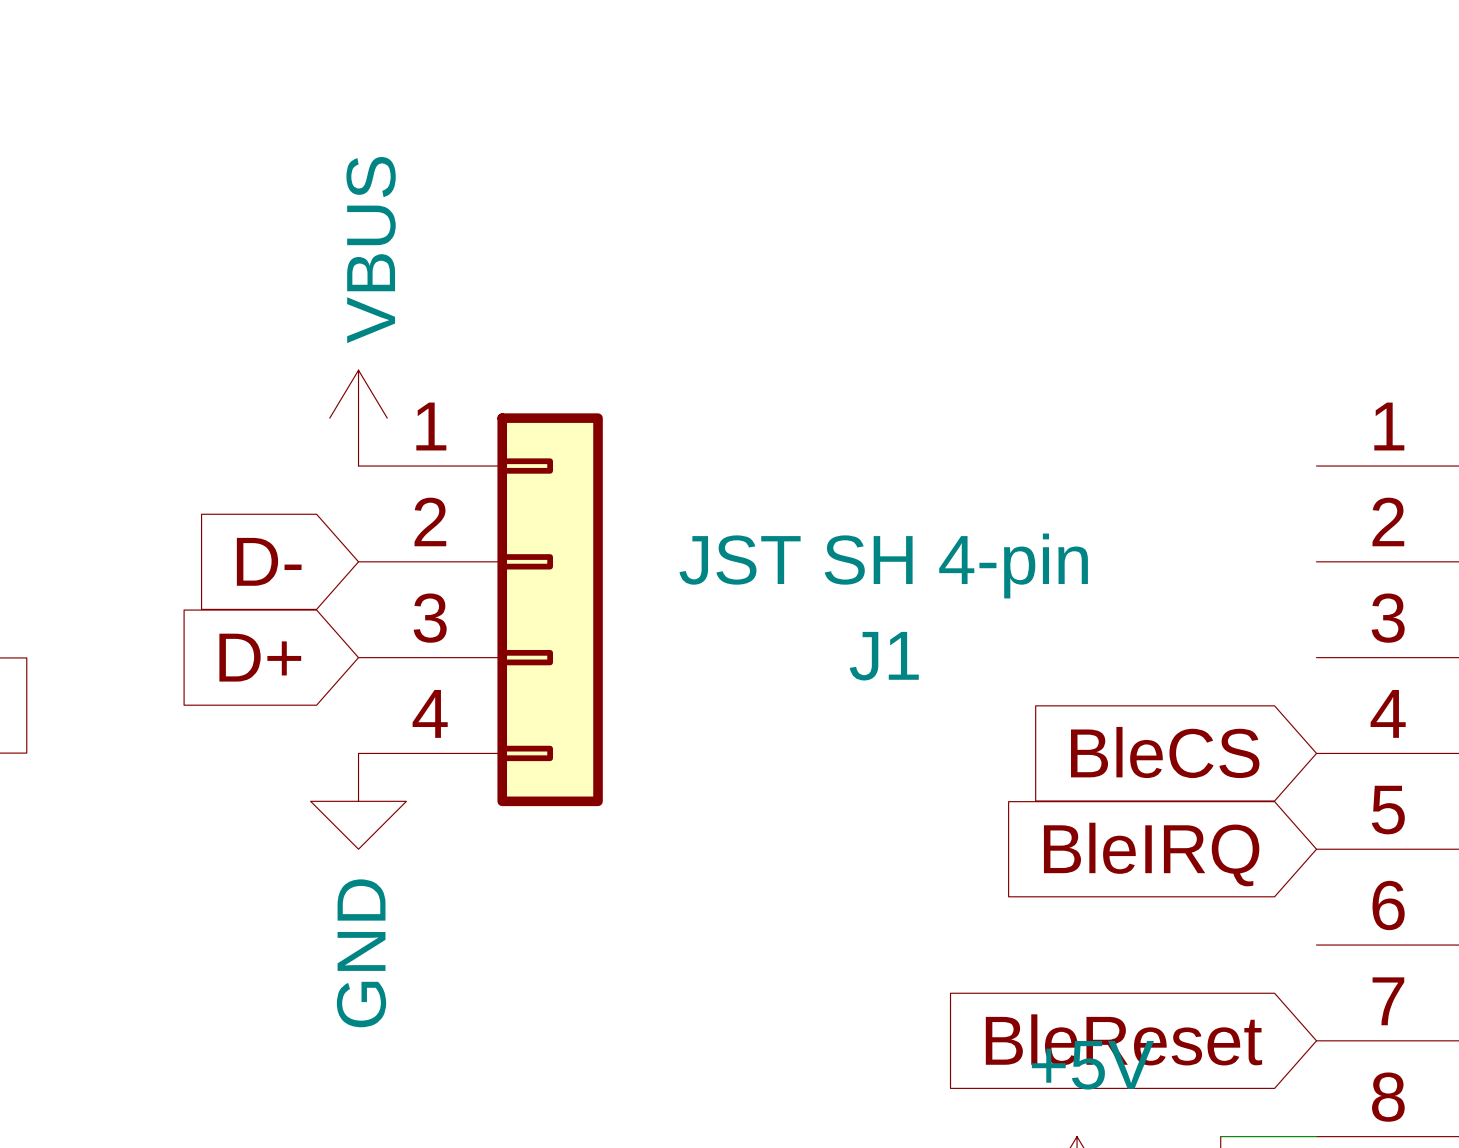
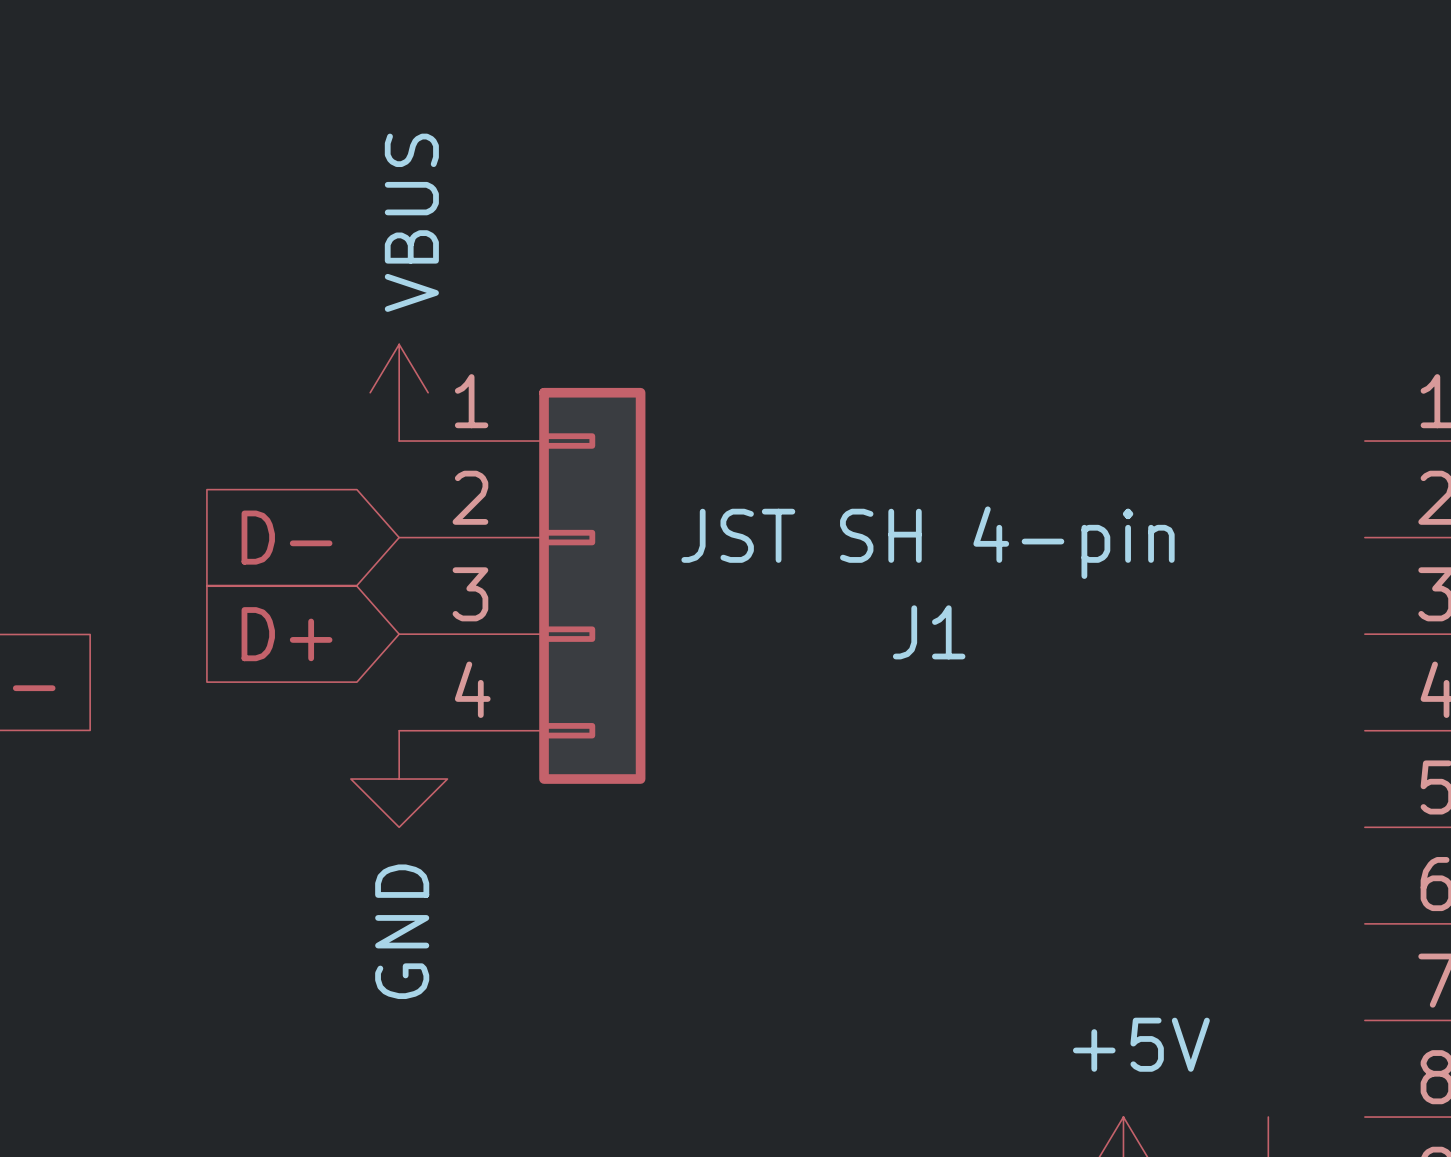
global label: BleCS (1165, 752) -> none
global label: BleIRQ (1151, 854) -> none
global label: BleReset (1123, 1039) -> none
wire: (1220, 1136) (1316, 1136) -> none

